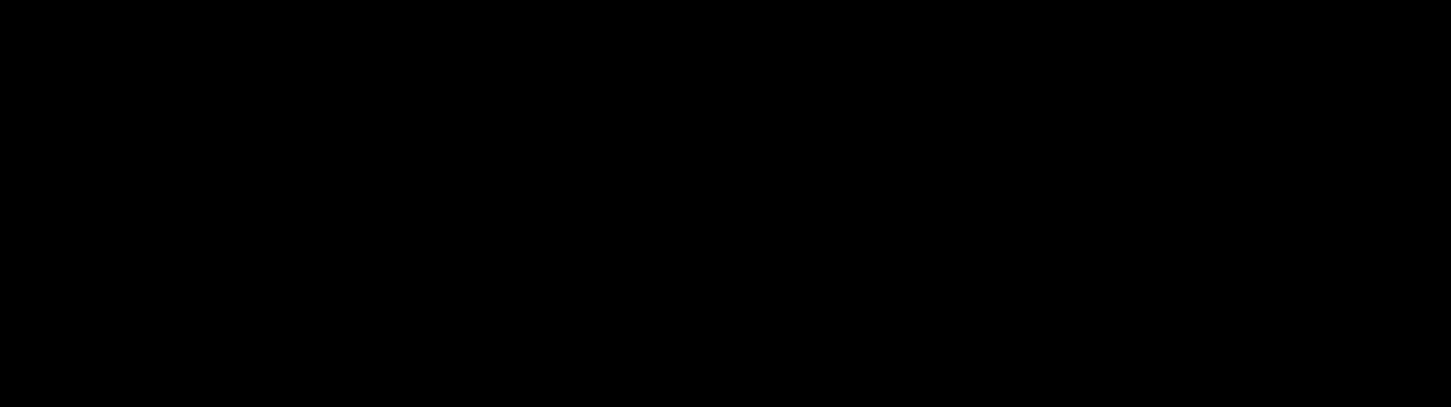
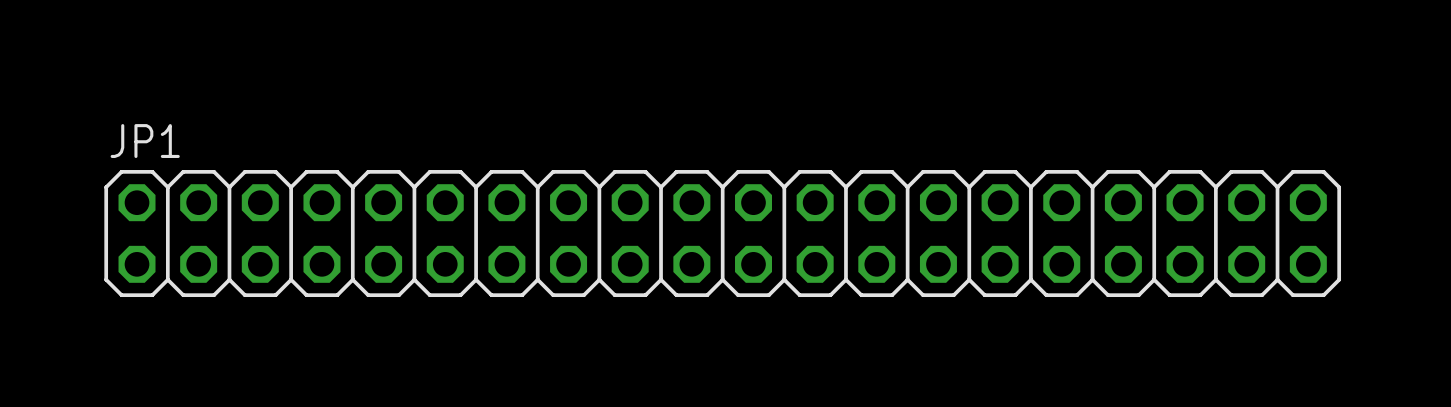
JP1: none -> (722, 233)

